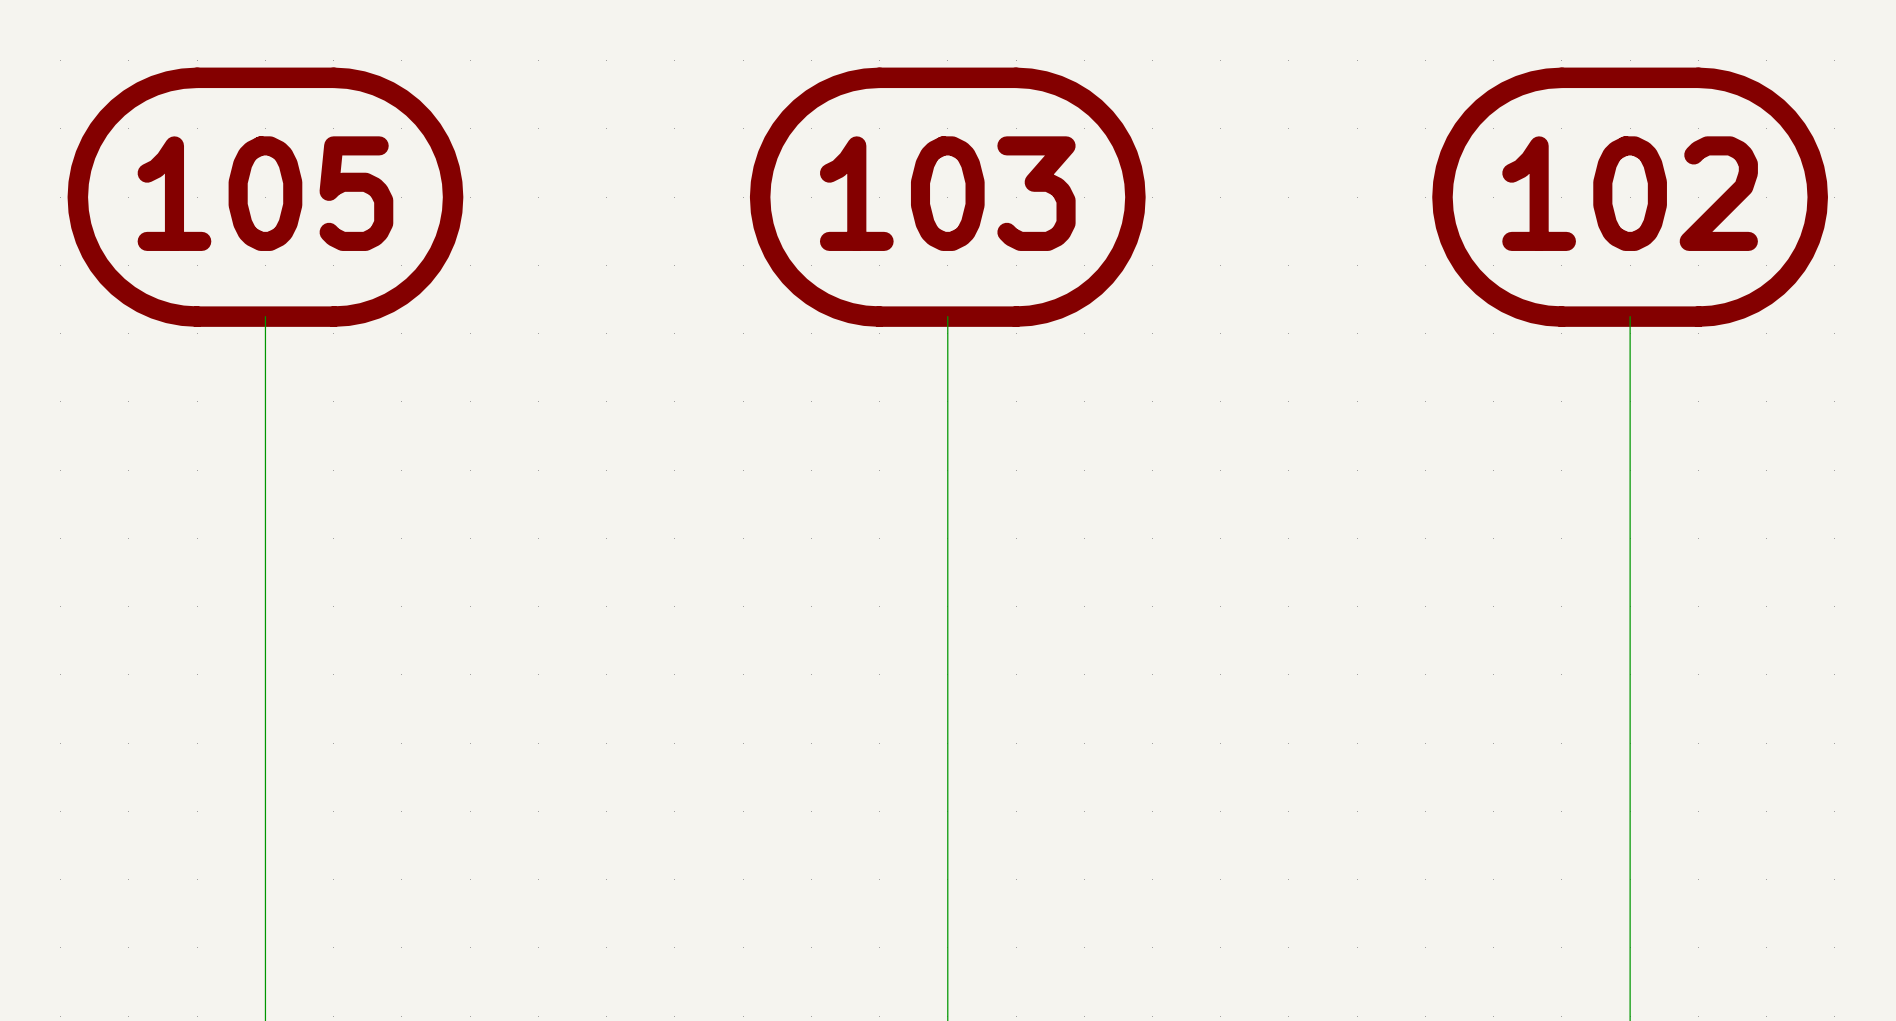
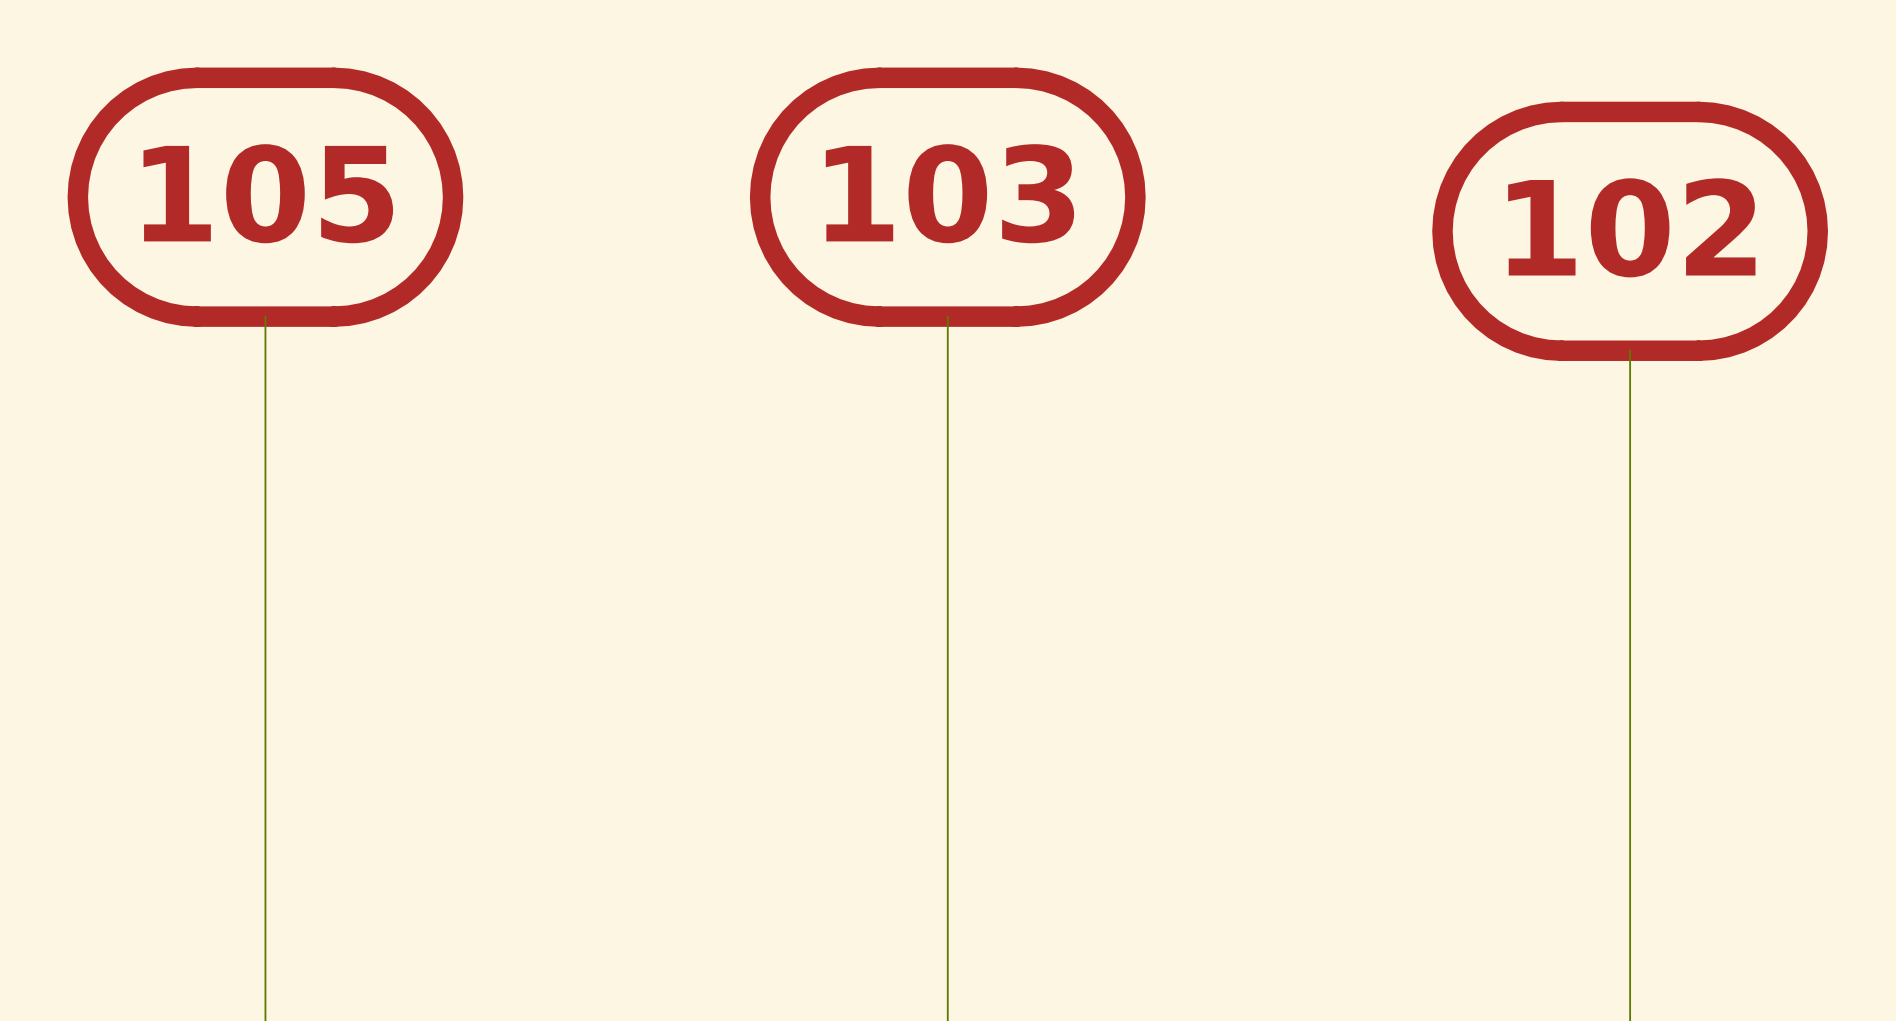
part position: (1630, 197) -> (1630, 231)
wire: (1630, 316) (1630, 350) -> none

